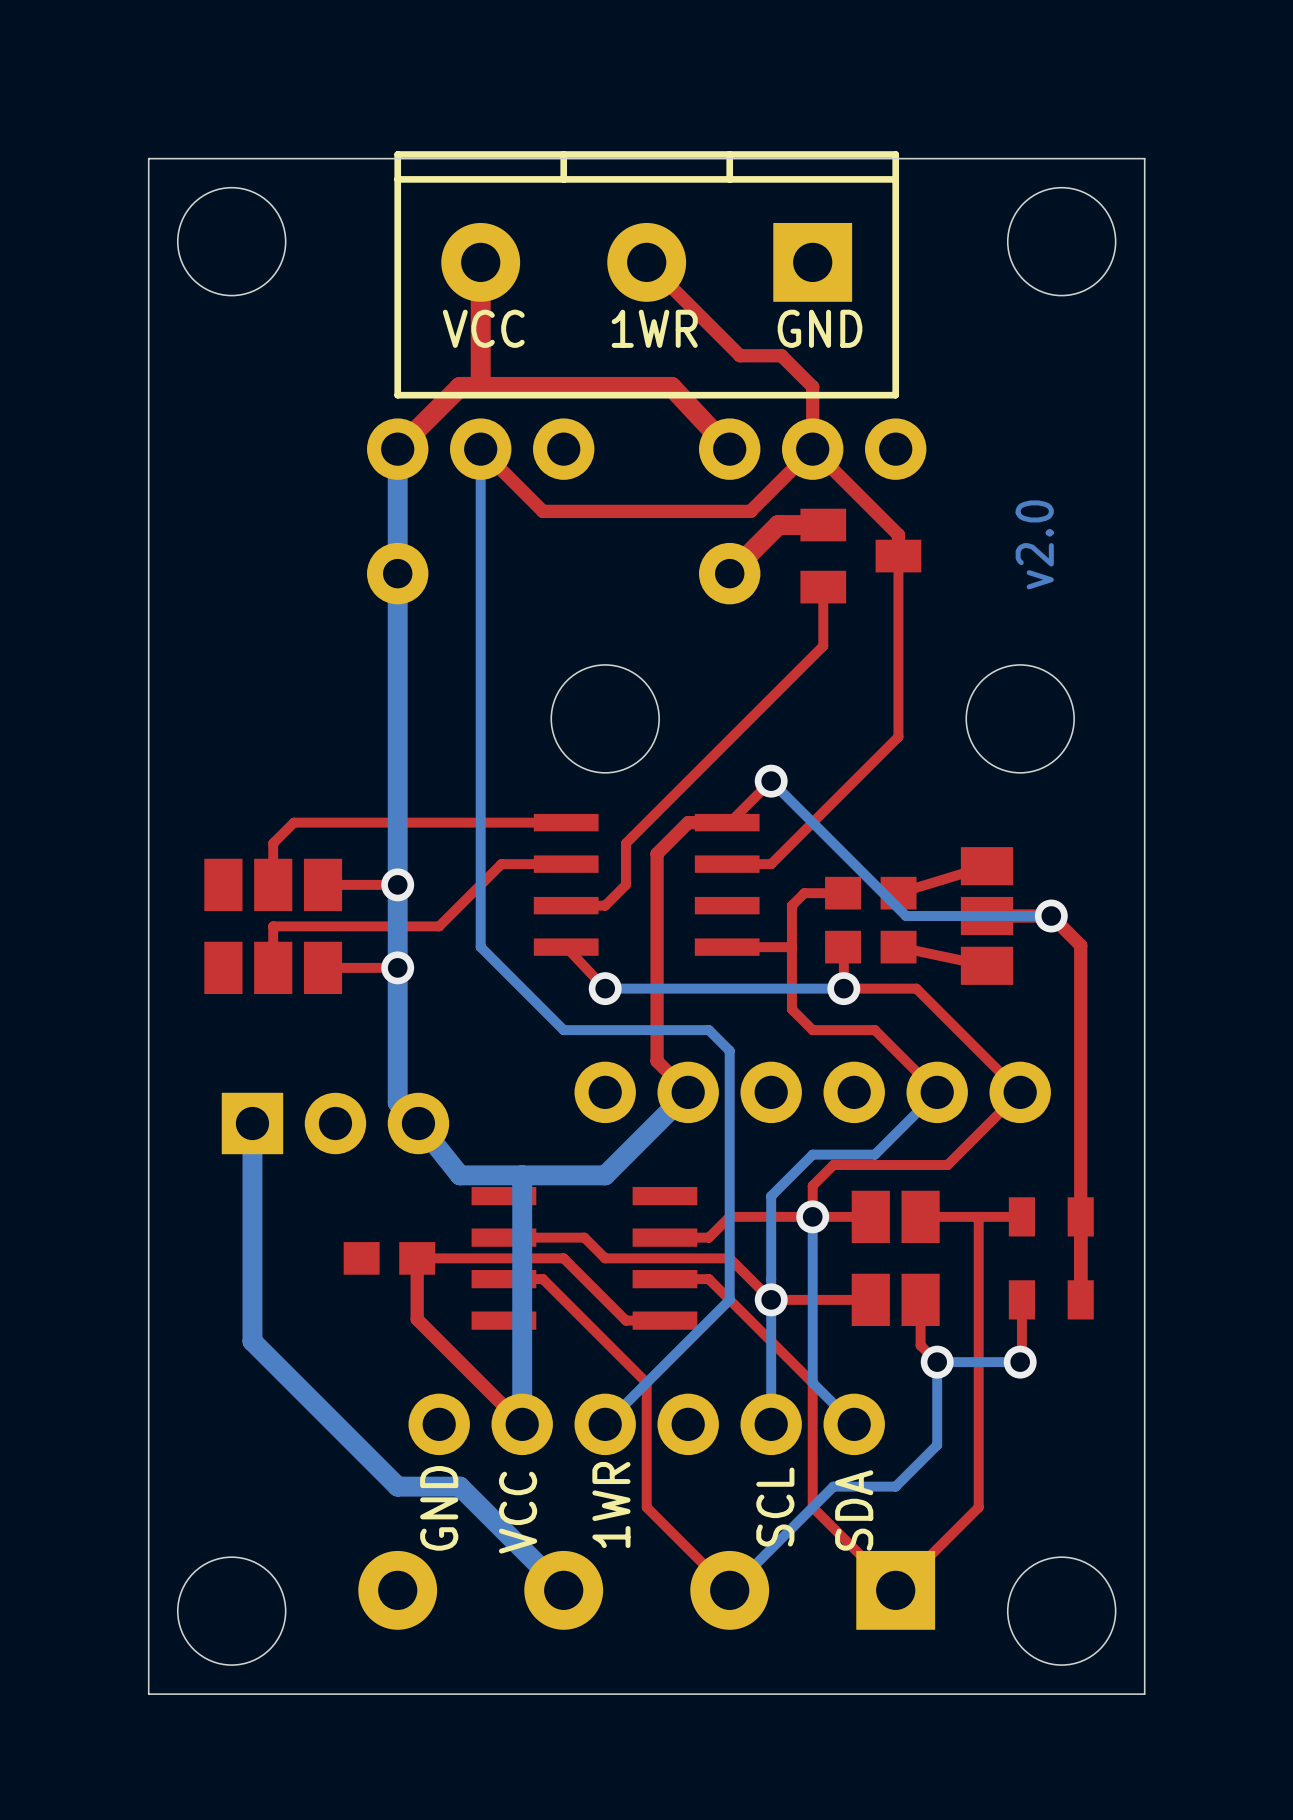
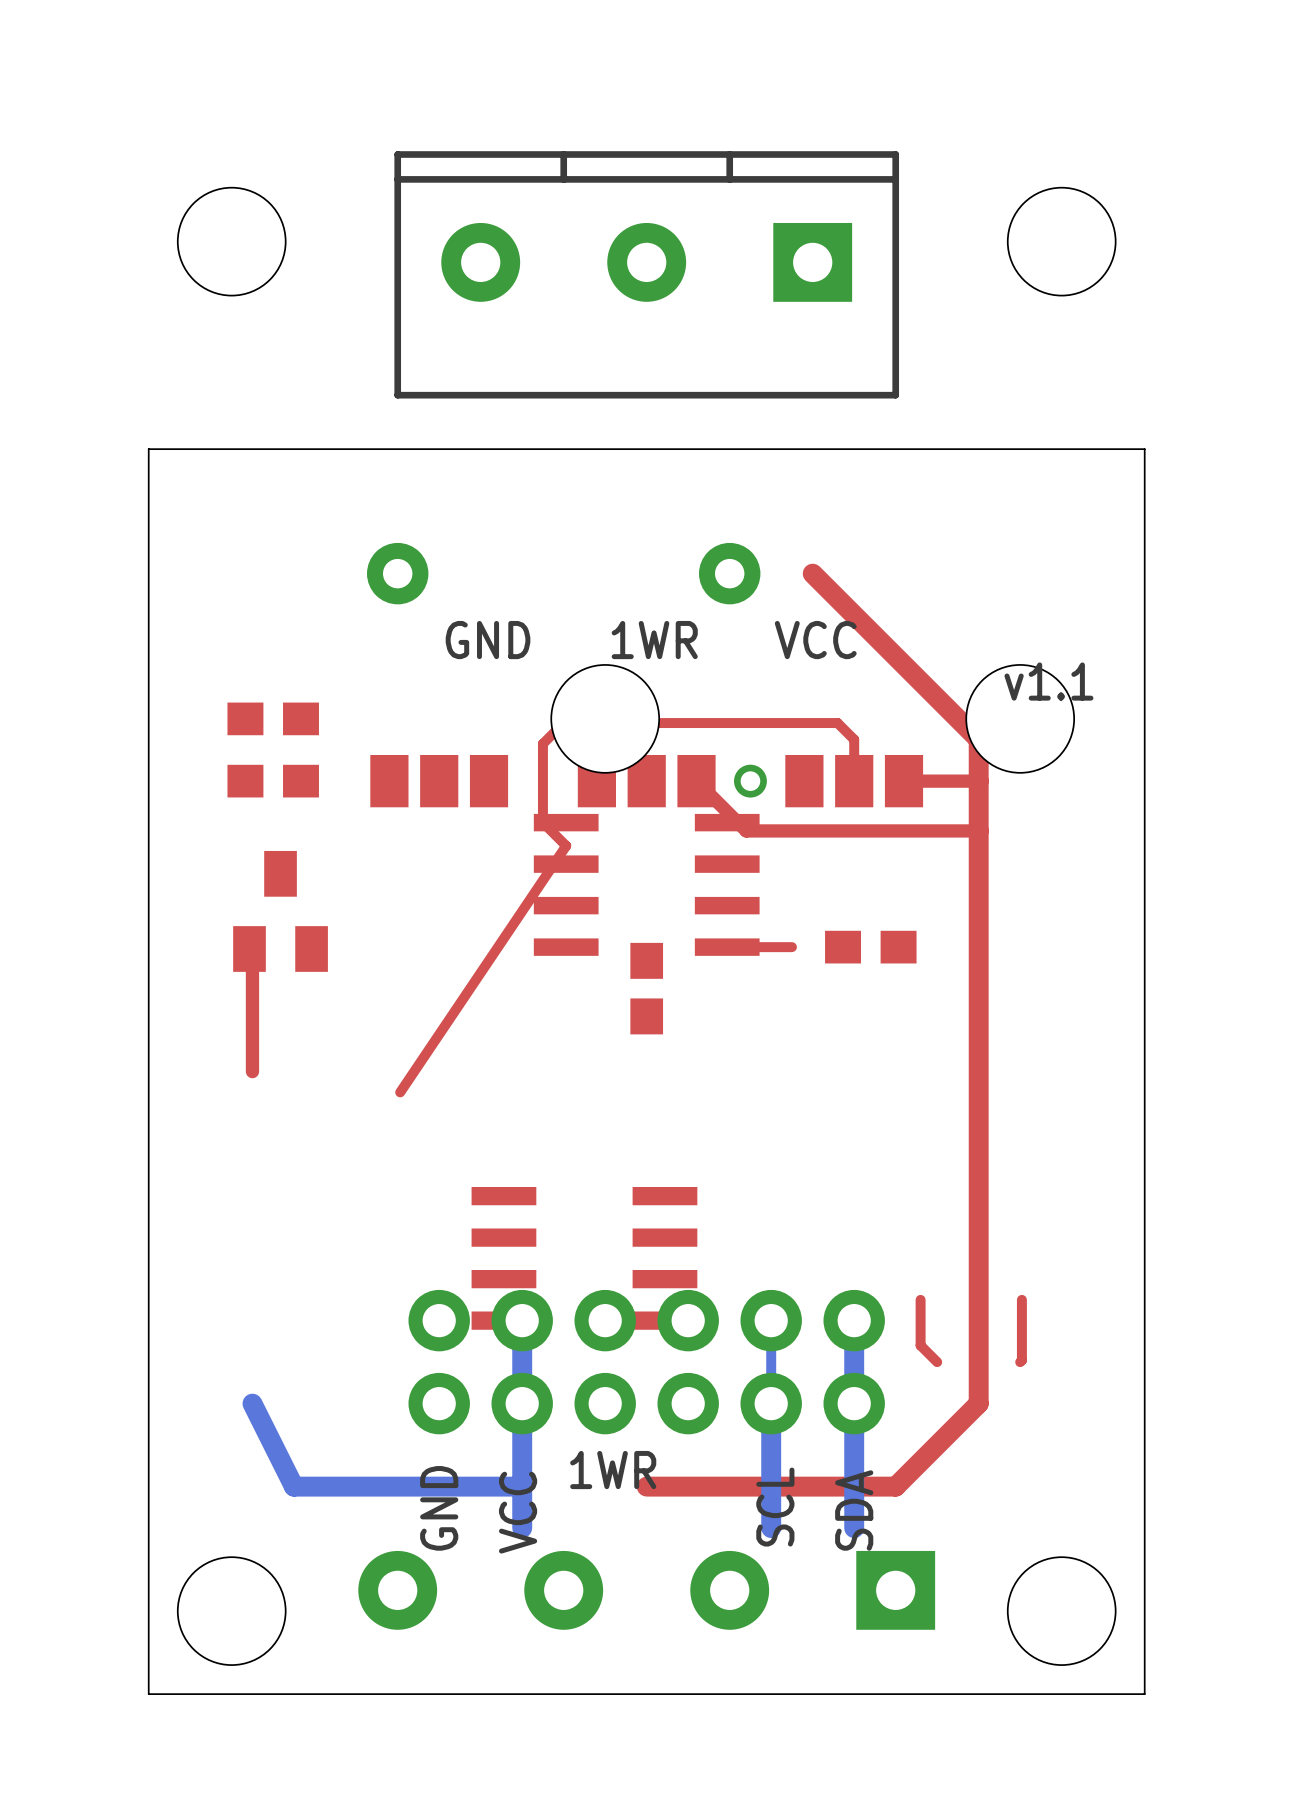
top track: (480, 262) (480, 386) -> none
top track: (646, 262) (740, 355) (781, 355) (812, 386) (812, 449) -> none
text position: VCC (483, 328) -> VCC (815, 640)
text position: 1WR (654, 328) -> 1WR (654, 640)
text position: GND (820, 328) -> GND (488, 640)
bottom track: (397, 449) (397, 1102) (418, 1123) (459, 1175) (605, 1175) (688, 1092) -> none
bottom track: (480, 449) (480, 947) (563, 1030) (708, 1030) (729, 1050) (729, 1299) (605, 1424) -> none
part: (480, 449) -> none
top track: (729, 449) (671, 386) (459, 386) (397, 449) -> none
top track: (812, 449) (750, 511) (542, 511) (480, 449) -> none
top track: (812, 449) (898, 534) (898, 736) (771, 864) (727, 864) -> none
part: (812, 449) -> none
board edge: (1144, 449) (1144, 158) (148, 158) (148, 449) -> (1144, 449) (148, 449)
top track: (823, 525) (778, 525) (729, 573) -> none
text: v2.0 (1034, 544) -> none
part: (860, 556) -> none
top track: none -> (812, 573) (978, 739) (978, 1216)
top track: (823, 587) (823, 646) (625, 843) (625, 884) (605, 905) (566, 905) -> none
text: none -> v1.1 (1048, 681)
part: none -> (273, 718)
part: none -> (273, 781)
part: none -> (439, 781)
part: none -> (646, 781)
top track: none -> (696, 781) (746, 830) (978, 830)
top track: (771, 781) (729, 822) (688, 822) (657, 853) (657, 1061) (688, 1092) -> none
bottom track: (771, 781) (906, 916) (1051, 916) -> none
via position: (771, 781) -> (750, 781)
top track: none -> (854, 781) (854, 739) (837, 723) (563, 723) (542, 743) (542, 822) (566, 845) (400, 1092)
part: none -> (854, 781)
top track: (566, 822) (293, 822) (273, 843) (273, 884) -> none
part footprint: [204, 858, 343, 912] -> [233, 850, 328, 972]
top track: (566, 864) (501, 864) (439, 926) (273, 926) (273, 967) -> none
top track: (987, 866) (898, 893) -> none
top track: (397, 884) (323, 884) -> (978, 781) (904, 781)
via: (397, 884) -> none
part: (870, 893) -> none
top track: (840, 895) (843, 893) (804, 893) (791, 905) (791, 1009) (812, 1030) (874, 1030) (937, 1092) -> none
top track: (987, 916) (1051, 916) (1080, 945) (1080, 1299) -> none
part: (987, 916) -> none
via: (1051, 916) -> none
top track: (566, 947) (605, 988) -> none
top track: (843, 947) (843, 988) (916, 988) (1020, 1092) (947, 1165) (833, 1165) (812, 1185) (812, 1216) -> none
top track: (898, 947) (987, 965) -> none
top track: none -> (249, 948) (252, 951) (252, 1071)
part: (273, 967) -> none
top track: (397, 967) (323, 967) -> none
via: (397, 967) -> none
via: (605, 988) -> none
part: none -> (646, 988)
bottom track: (843, 988) (605, 988) -> none
via: (843, 988) -> none
part position: (812, 1092) -> (646, 1320)
bottom track: (937, 1092) (874, 1154) (812, 1154) (771, 1196) (771, 1320) -> none
bottom track: (252, 1123) (252, 1341) (397, 1486) -> (252, 1403) (293, 1486) (397, 1486)
part: (335, 1123) -> none
bottom track: (522, 1175) (522, 1320) -> none
bottom track: (812, 1216) (812, 1382) (854, 1424) -> none
via: (812, 1216) -> none
top track: (870, 1216) (729, 1216) (708, 1237) (664, 1237) -> none
part: (895, 1216) -> none
top track width: thin (978, 1216) (978, 1403) -> thick (978, 1216) (978, 1403)
top track: (1021, 1216) (920, 1216) -> none
part: (1051, 1216) -> none
top track: (503, 1237) (584, 1237) (605, 1258) (729, 1258) (771, 1299) (870, 1299) -> none
part: (389, 1258) -> none
top track: (503, 1279) (542, 1279) (646, 1382) (646, 1507) (729, 1590) -> none
top track: (664, 1279) (708, 1279) (812, 1382) (812, 1507) (895, 1590) (978, 1507) (978, 1403) -> (646, 1486) (895, 1486) (978, 1403)
via: (771, 1299) -> none
part: (895, 1299) -> none
part: (1051, 1299) -> none
top track: (664, 1320) (625, 1320) (563, 1258) (417, 1258) (417, 1319) (522, 1424) -> none
bottom track: none -> (854, 1320) (854, 1528)
via: (937, 1362) -> none
bottom track: (1020, 1362) (937, 1362) (937, 1445) (895, 1486) (833, 1486) (729, 1590) -> none
via: (1020, 1362) -> none
bottom track: none -> (522, 1424) (522, 1528)
part position: (646, 1424) -> (646, 1403)
bottom track: none -> (771, 1424) (771, 1528)
bottom track: (459, 1486) (563, 1590) -> (459, 1486) (522, 1486)
text rotation: 0° (611, 1505) -> 90° clockwise (613, 1470)

